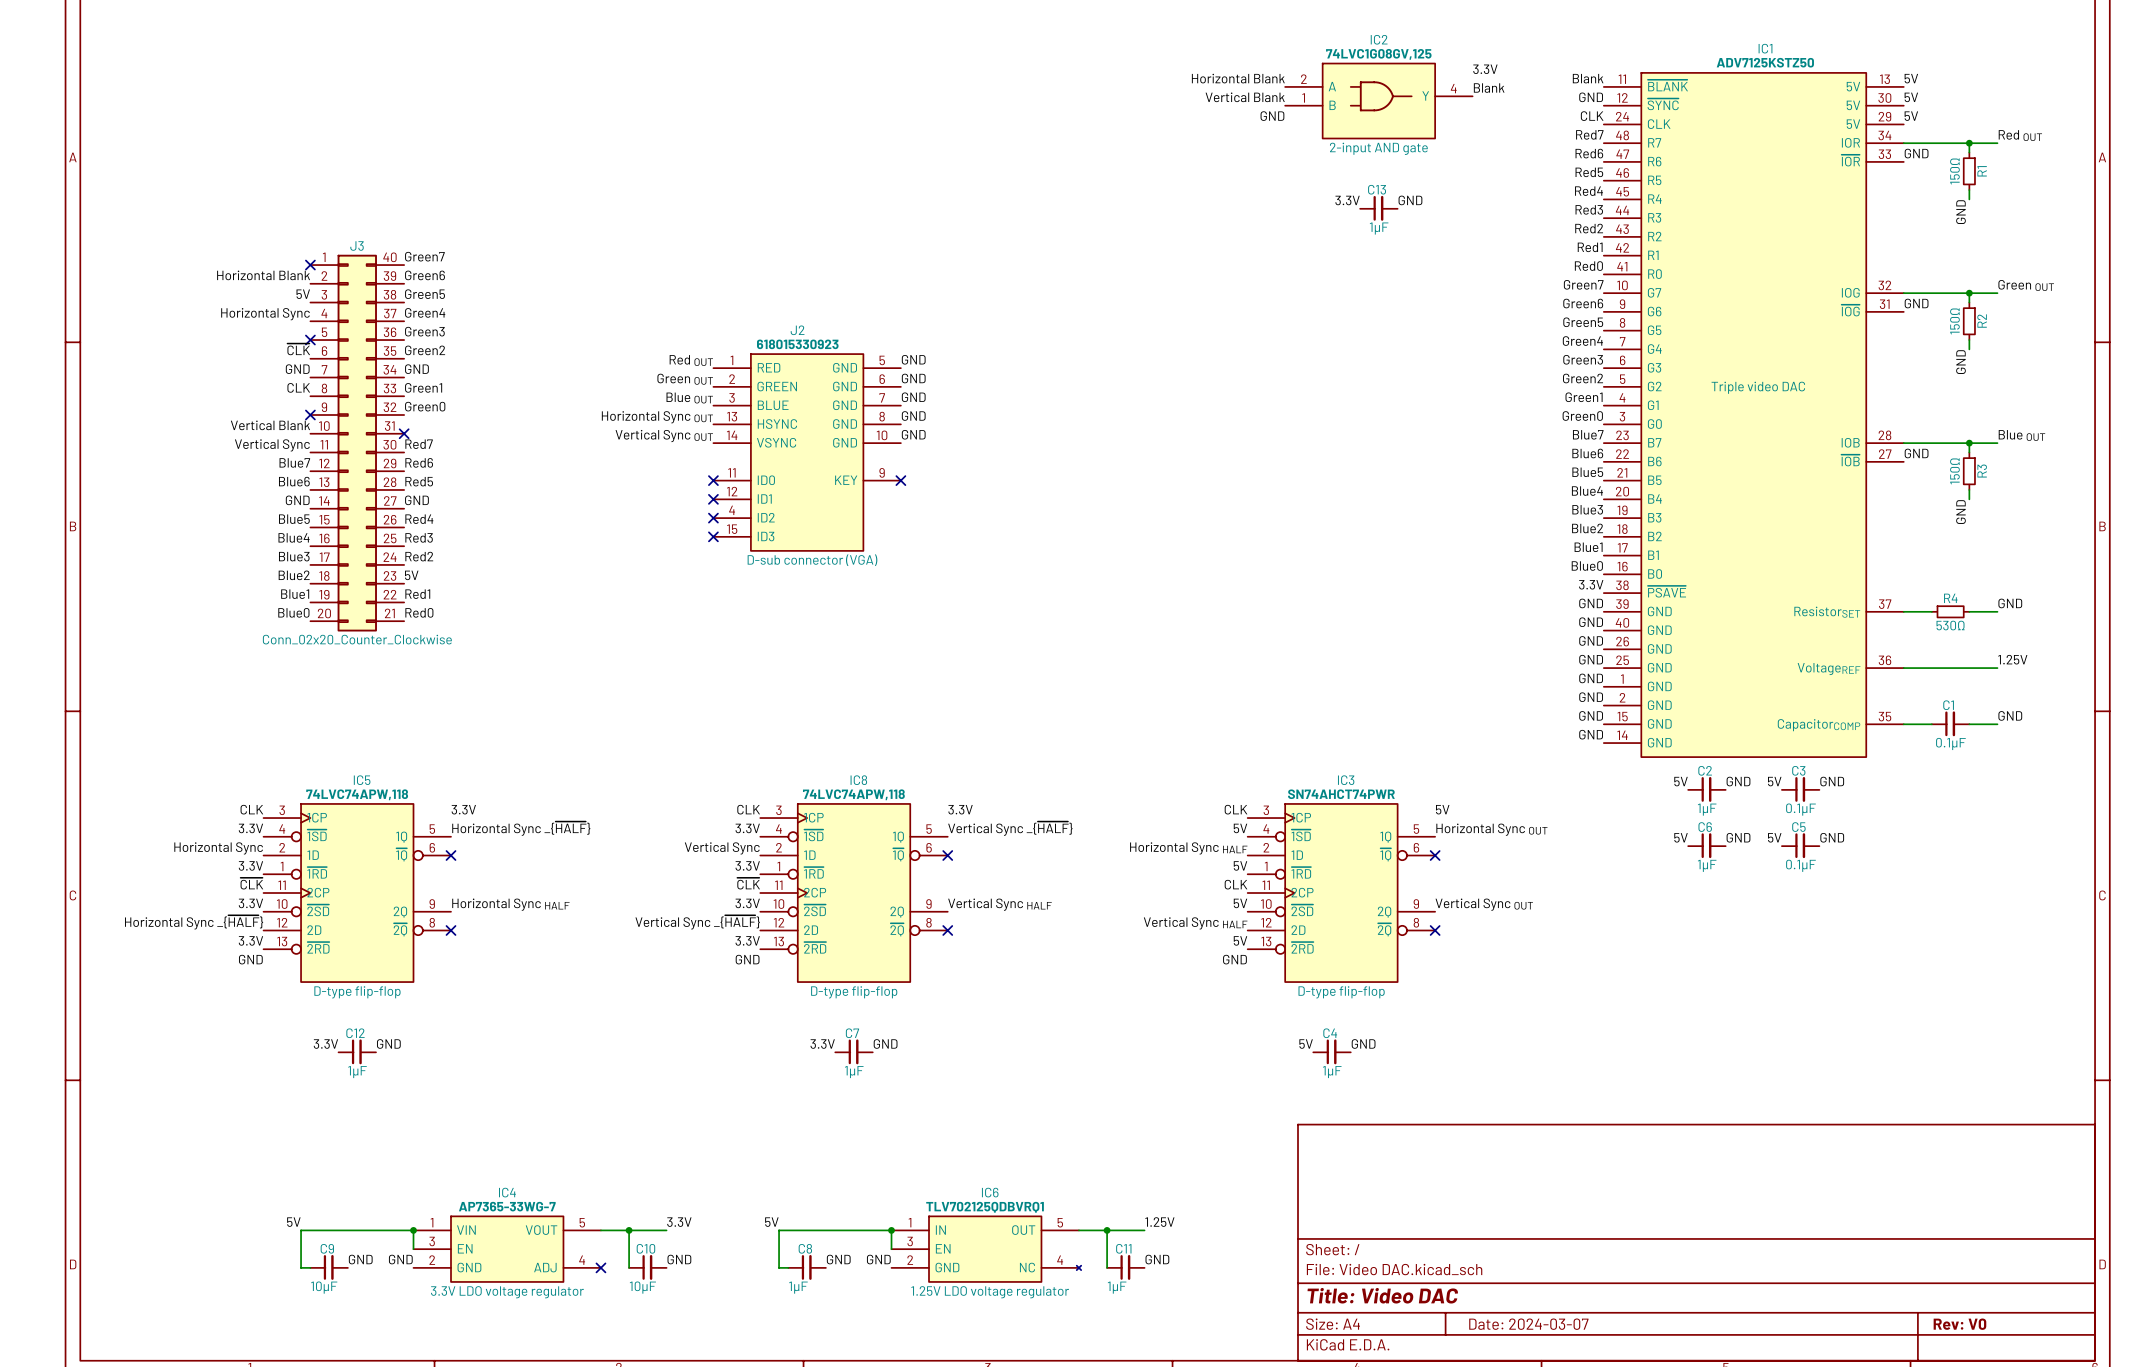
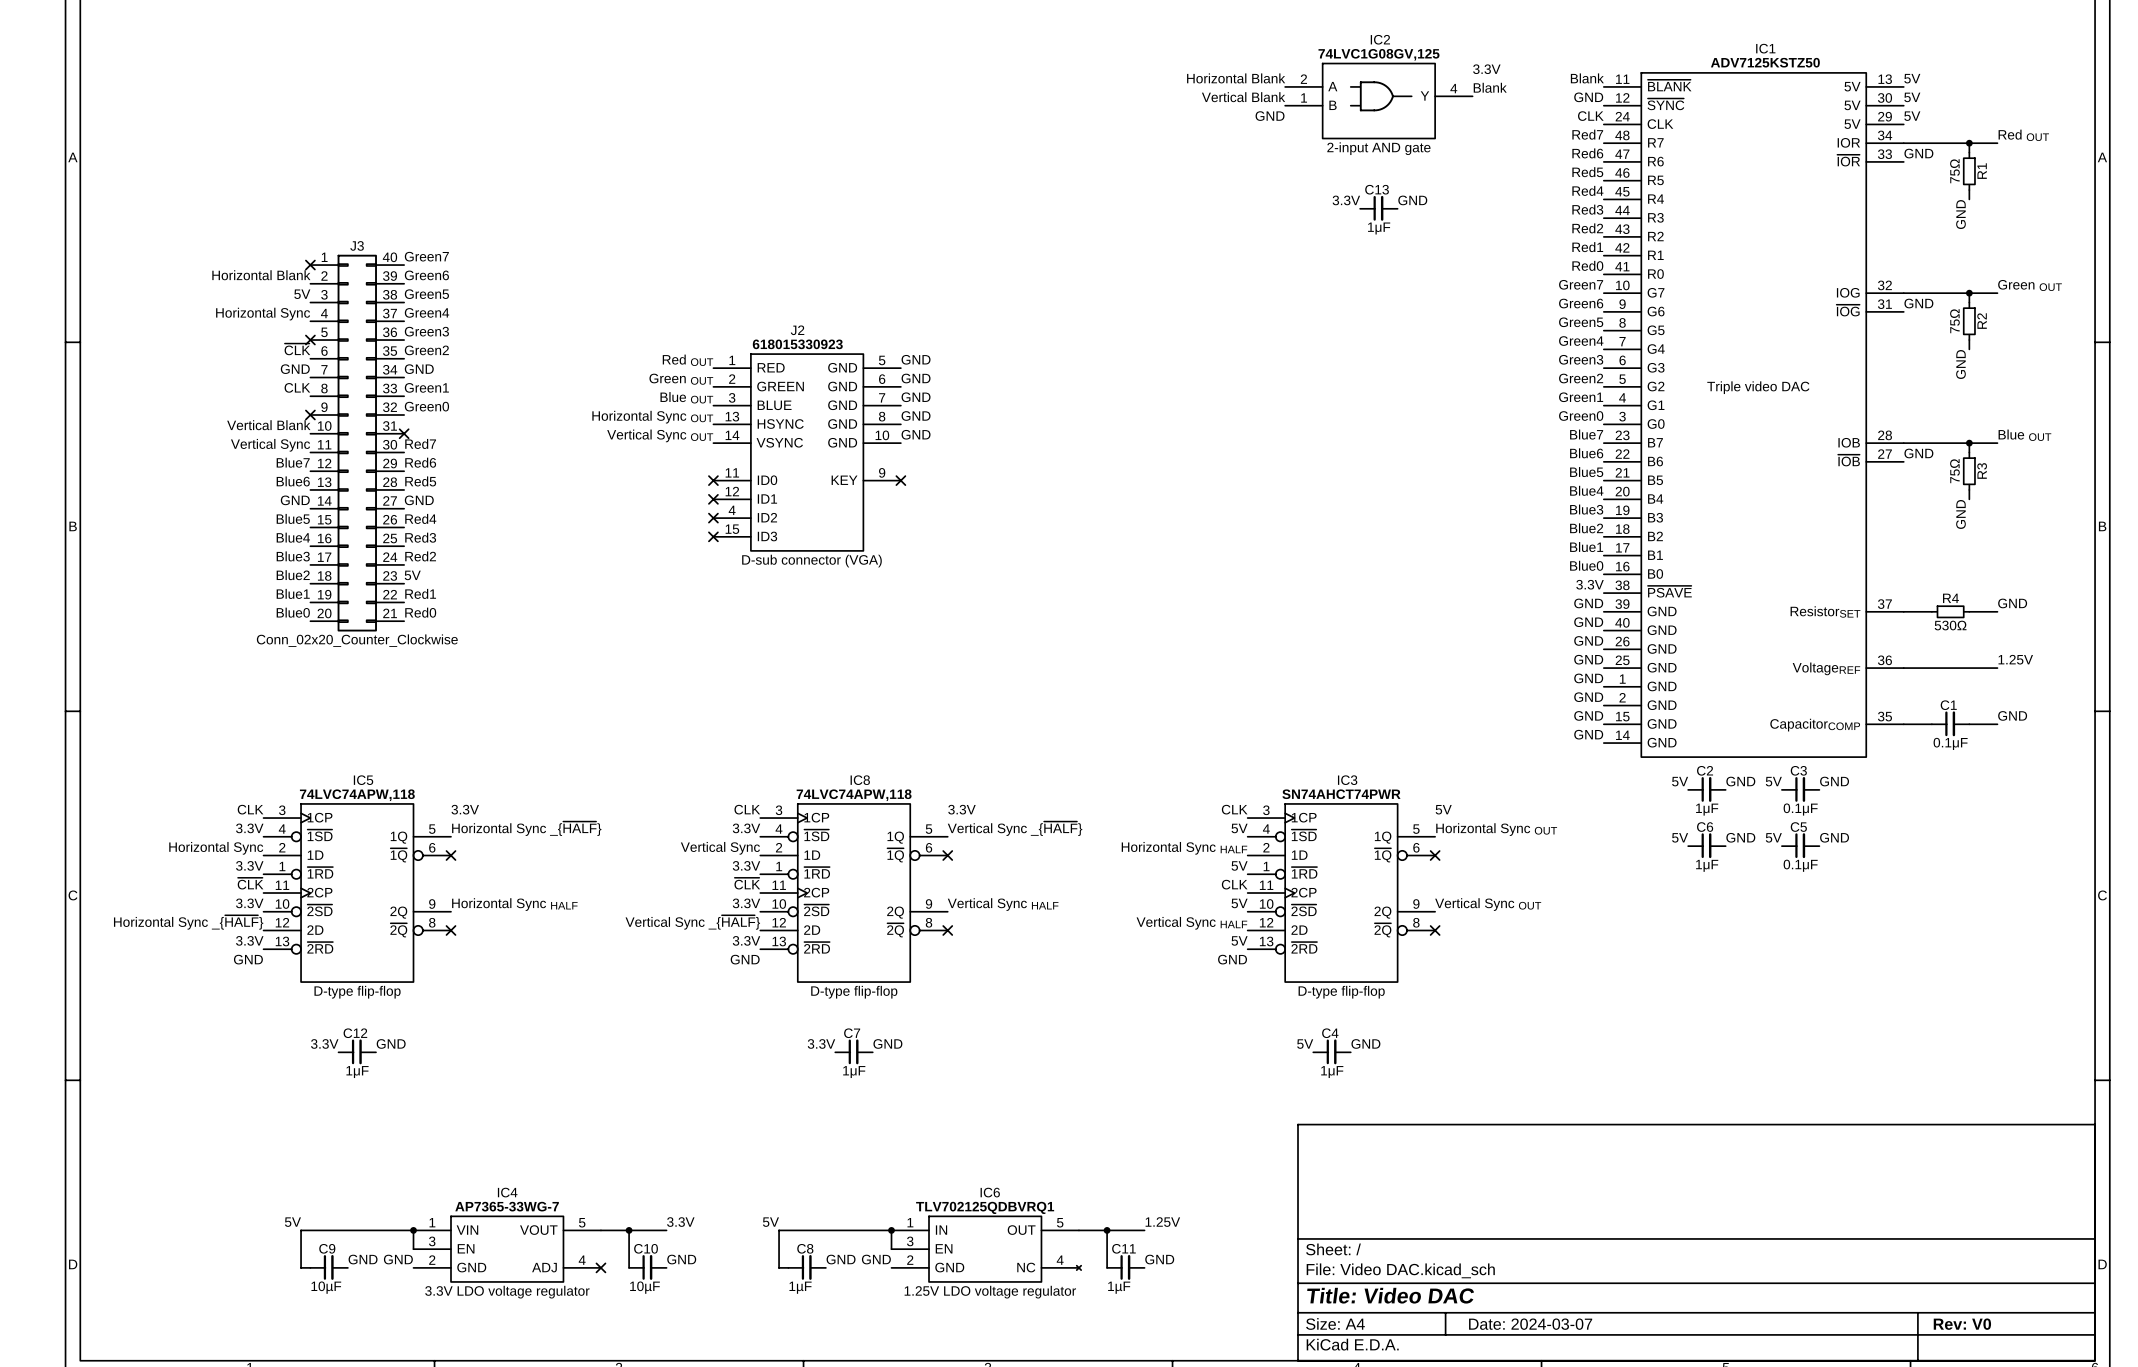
R1 value: 150Ω (1954, 171) -> 75Ω (1954, 171)
R2 value: 150Ω (1954, 321) -> 75Ω (1954, 321)
R3 value: 150Ω (1954, 471) -> 75Ω (1954, 471)

